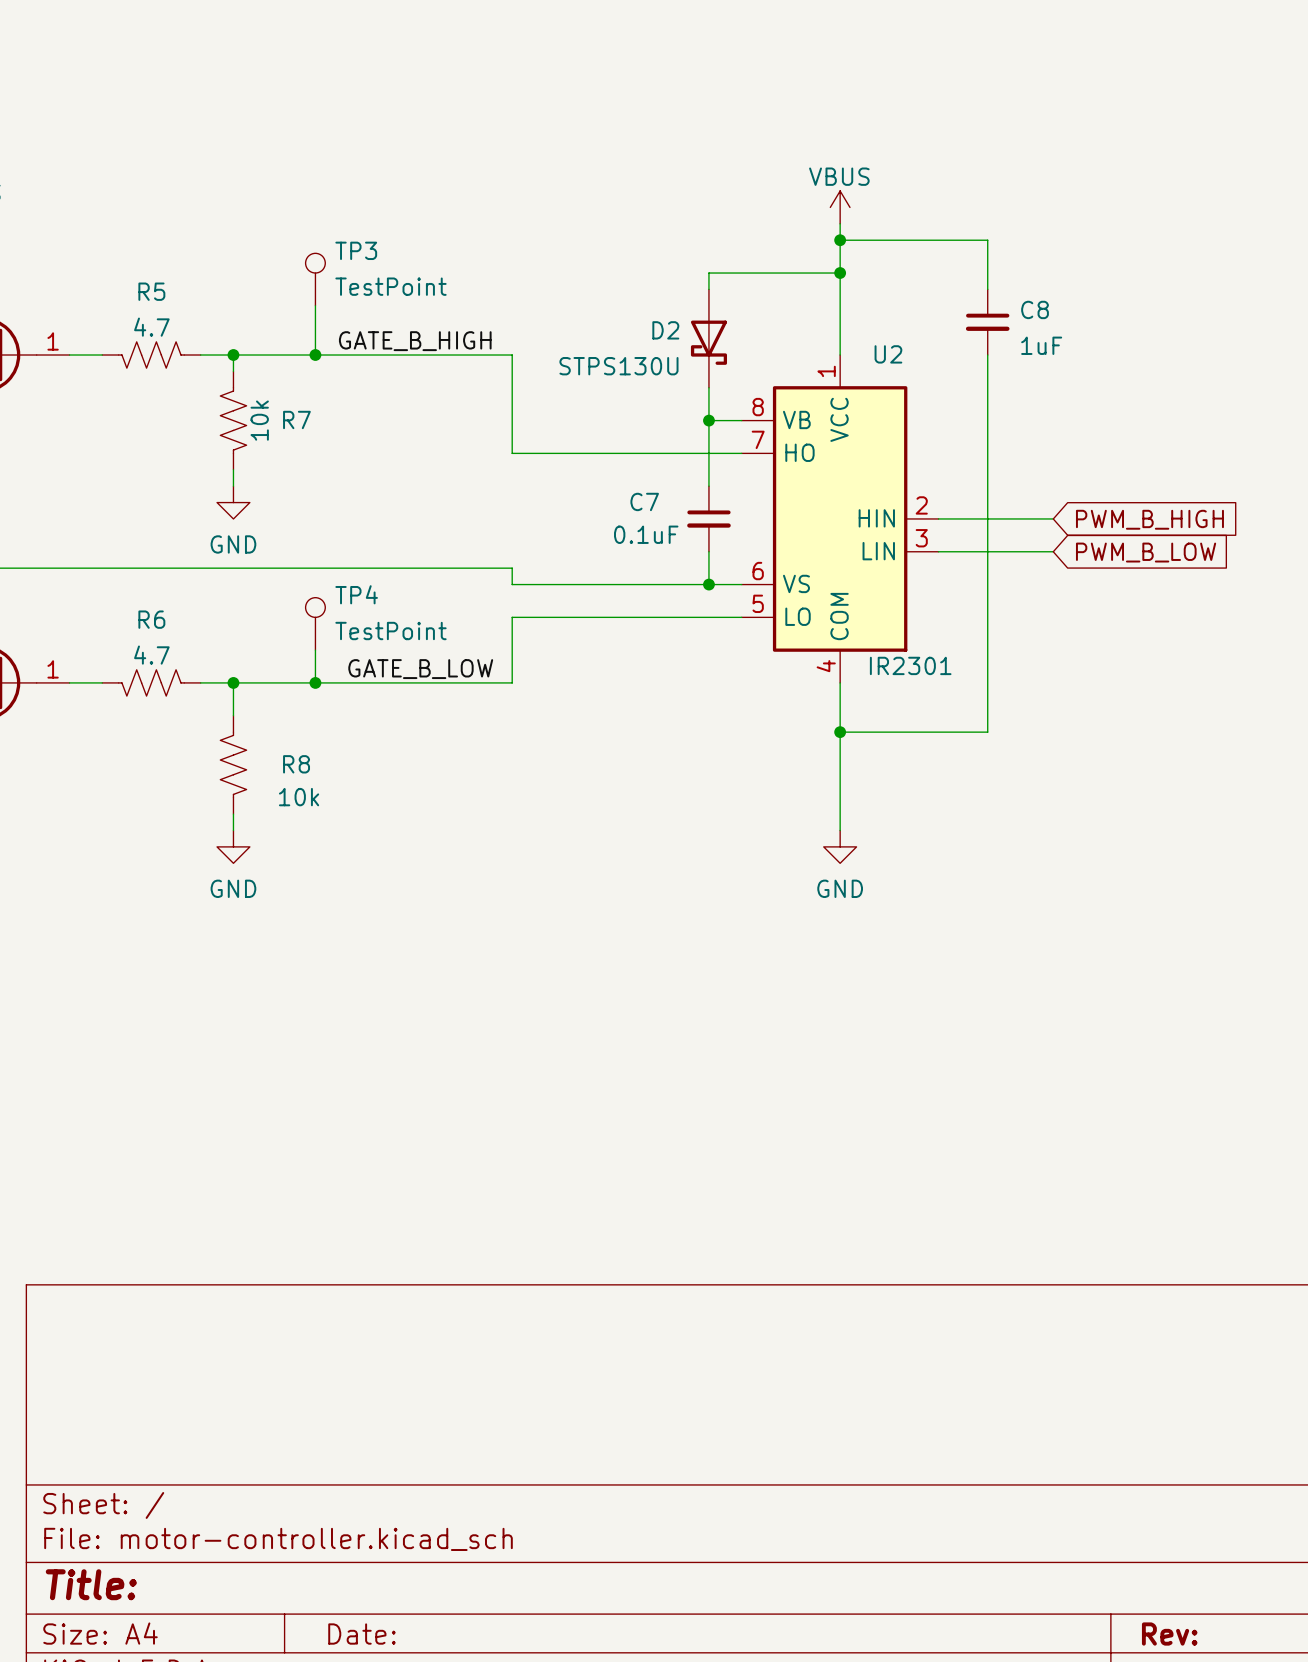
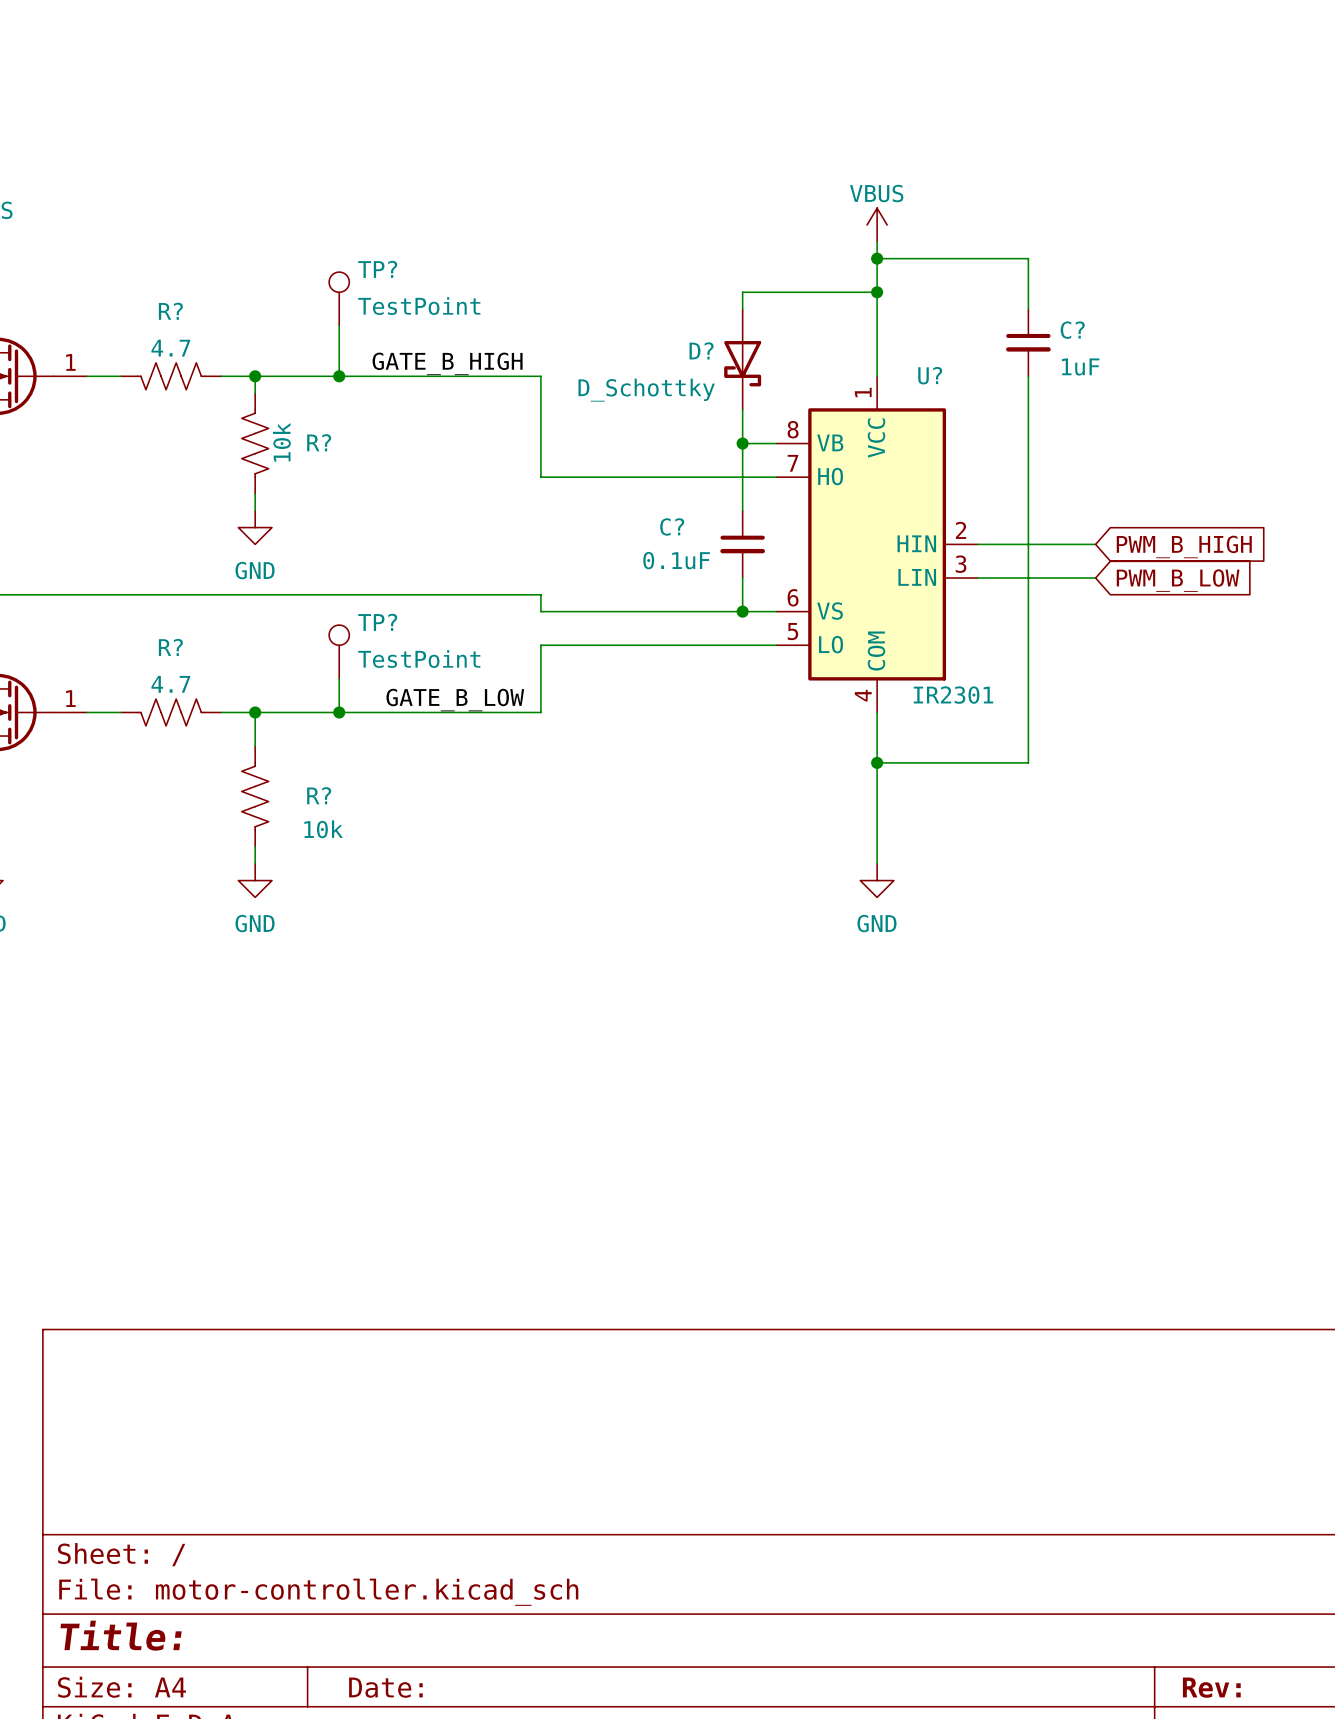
TP3 name: TP3 (356, 250) -> TP? (377, 269)
R5 name: R5 (151, 291) -> R? (170, 311)
C8 name: C8 (1035, 309) -> C? (1072, 330)
D2 name: D2 (665, 330) -> D? (701, 350)
U2 name: U2 (888, 354) -> U? (930, 375)
D2 value: STPS130U (618, 366) -> D_Schottky (646, 390)
R7 name: R7 (296, 419) -> R? (319, 442)
C7 name: C7 (644, 501) -> C? (672, 526)
TP4 name: TP4 (356, 594) -> TP? (377, 622)
R6 name: R6 (151, 619) -> R? (170, 647)
R8 name: R8 (296, 764) -> R? (319, 795)

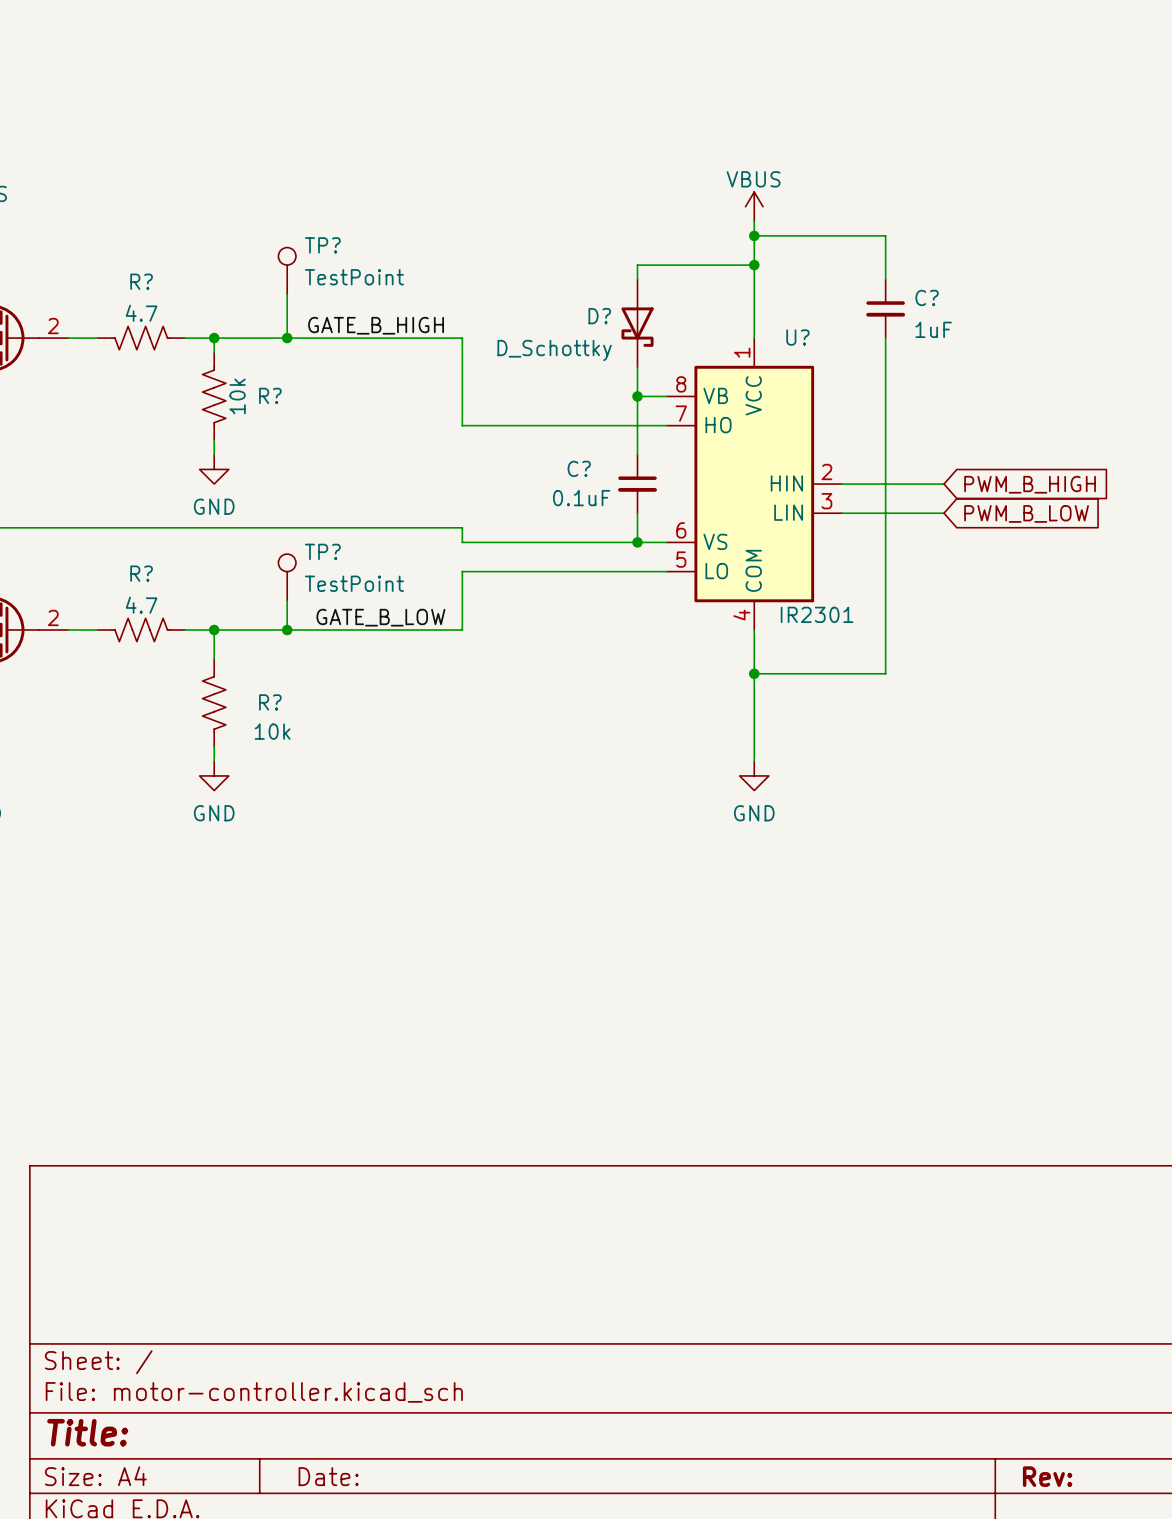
part pin number: 1 (70, 362) -> 2 (53, 326)
part pin number: 1 (70, 698) -> 2 (53, 617)

